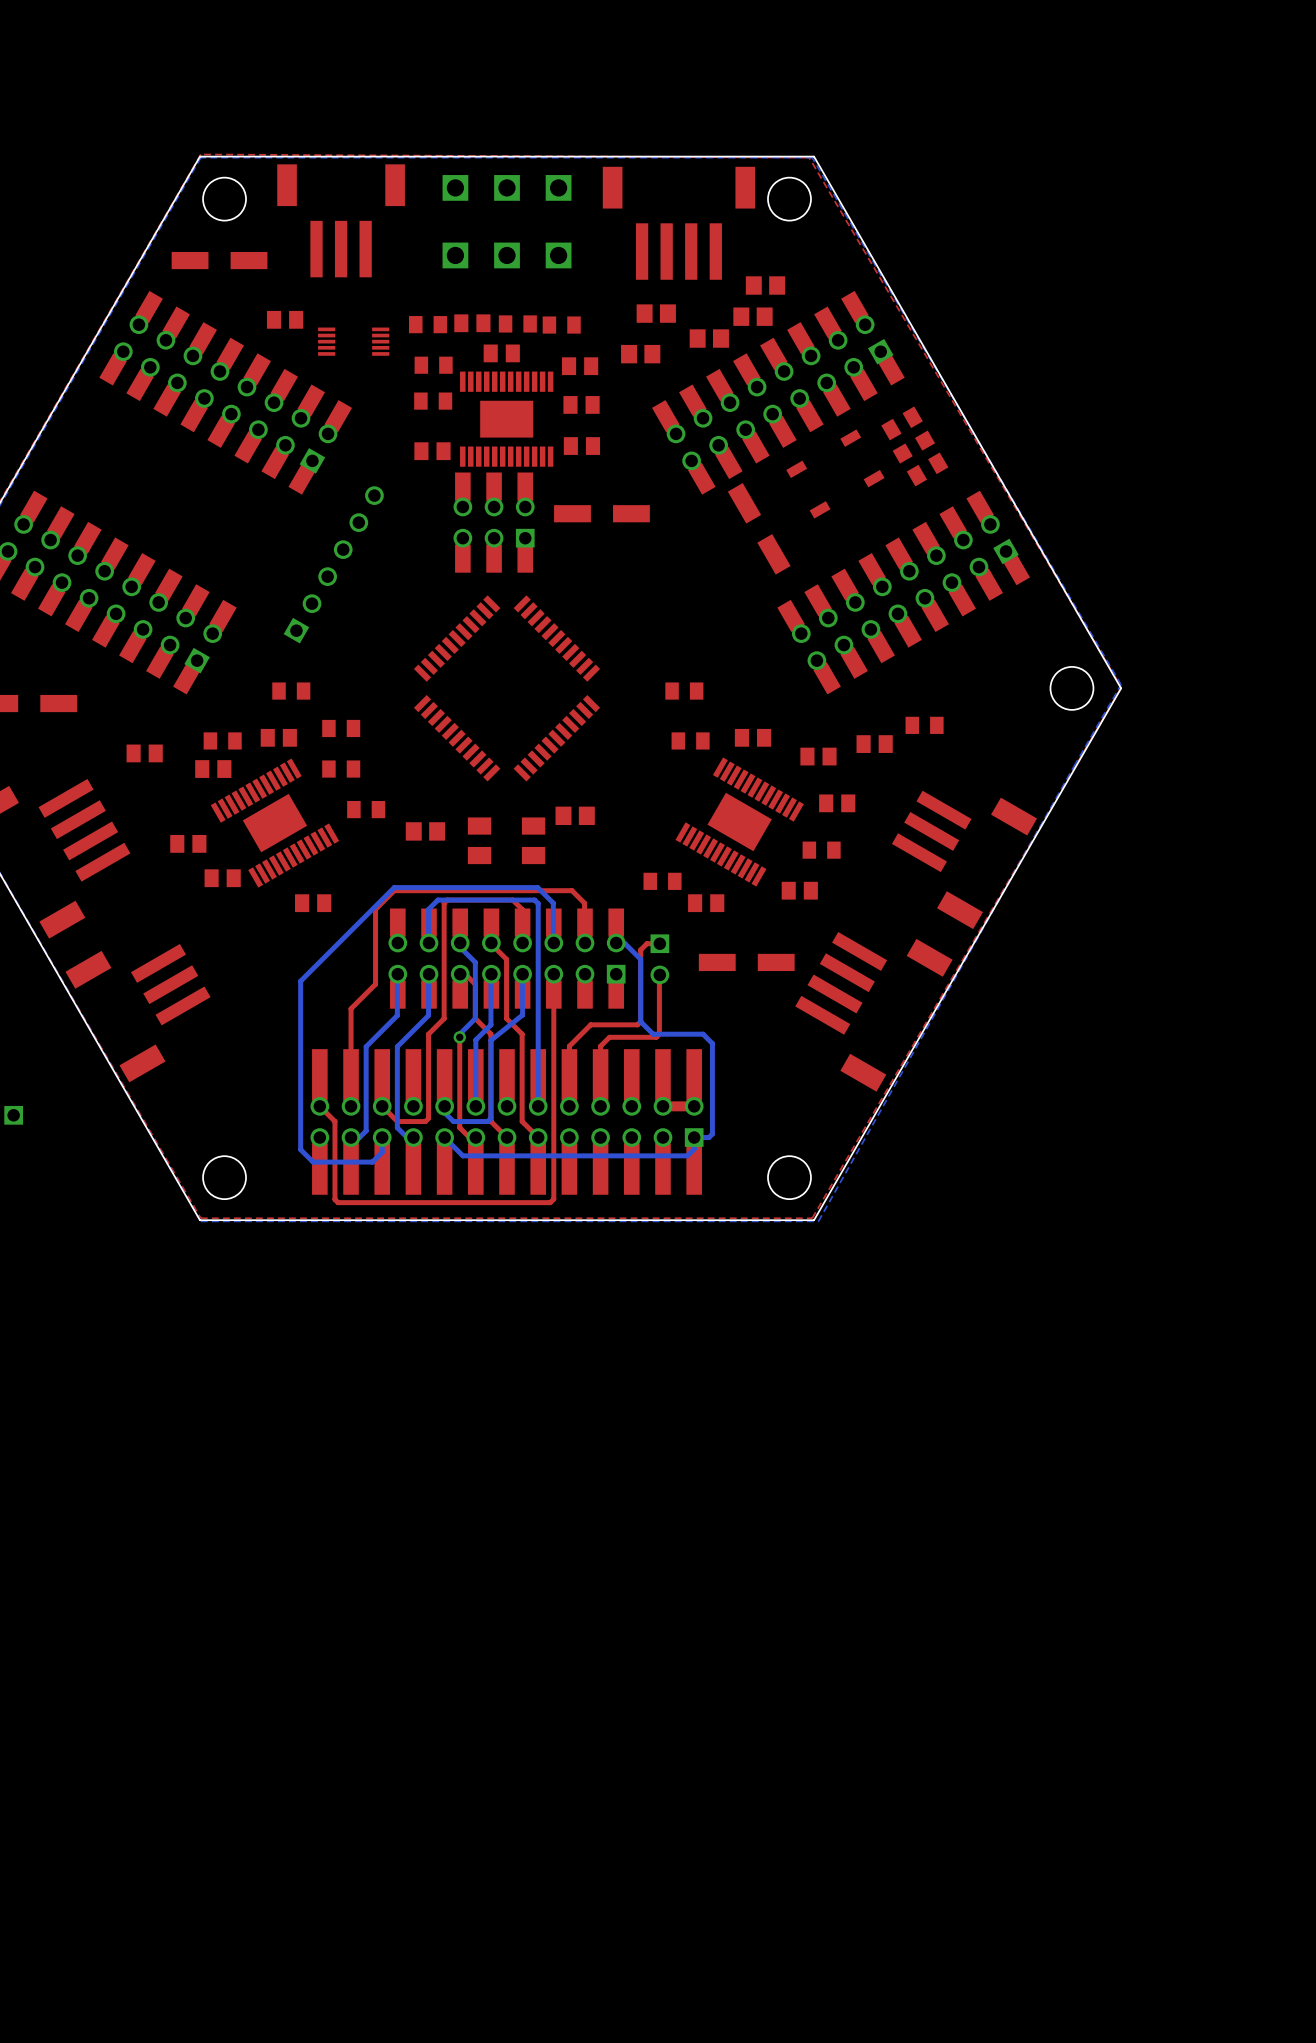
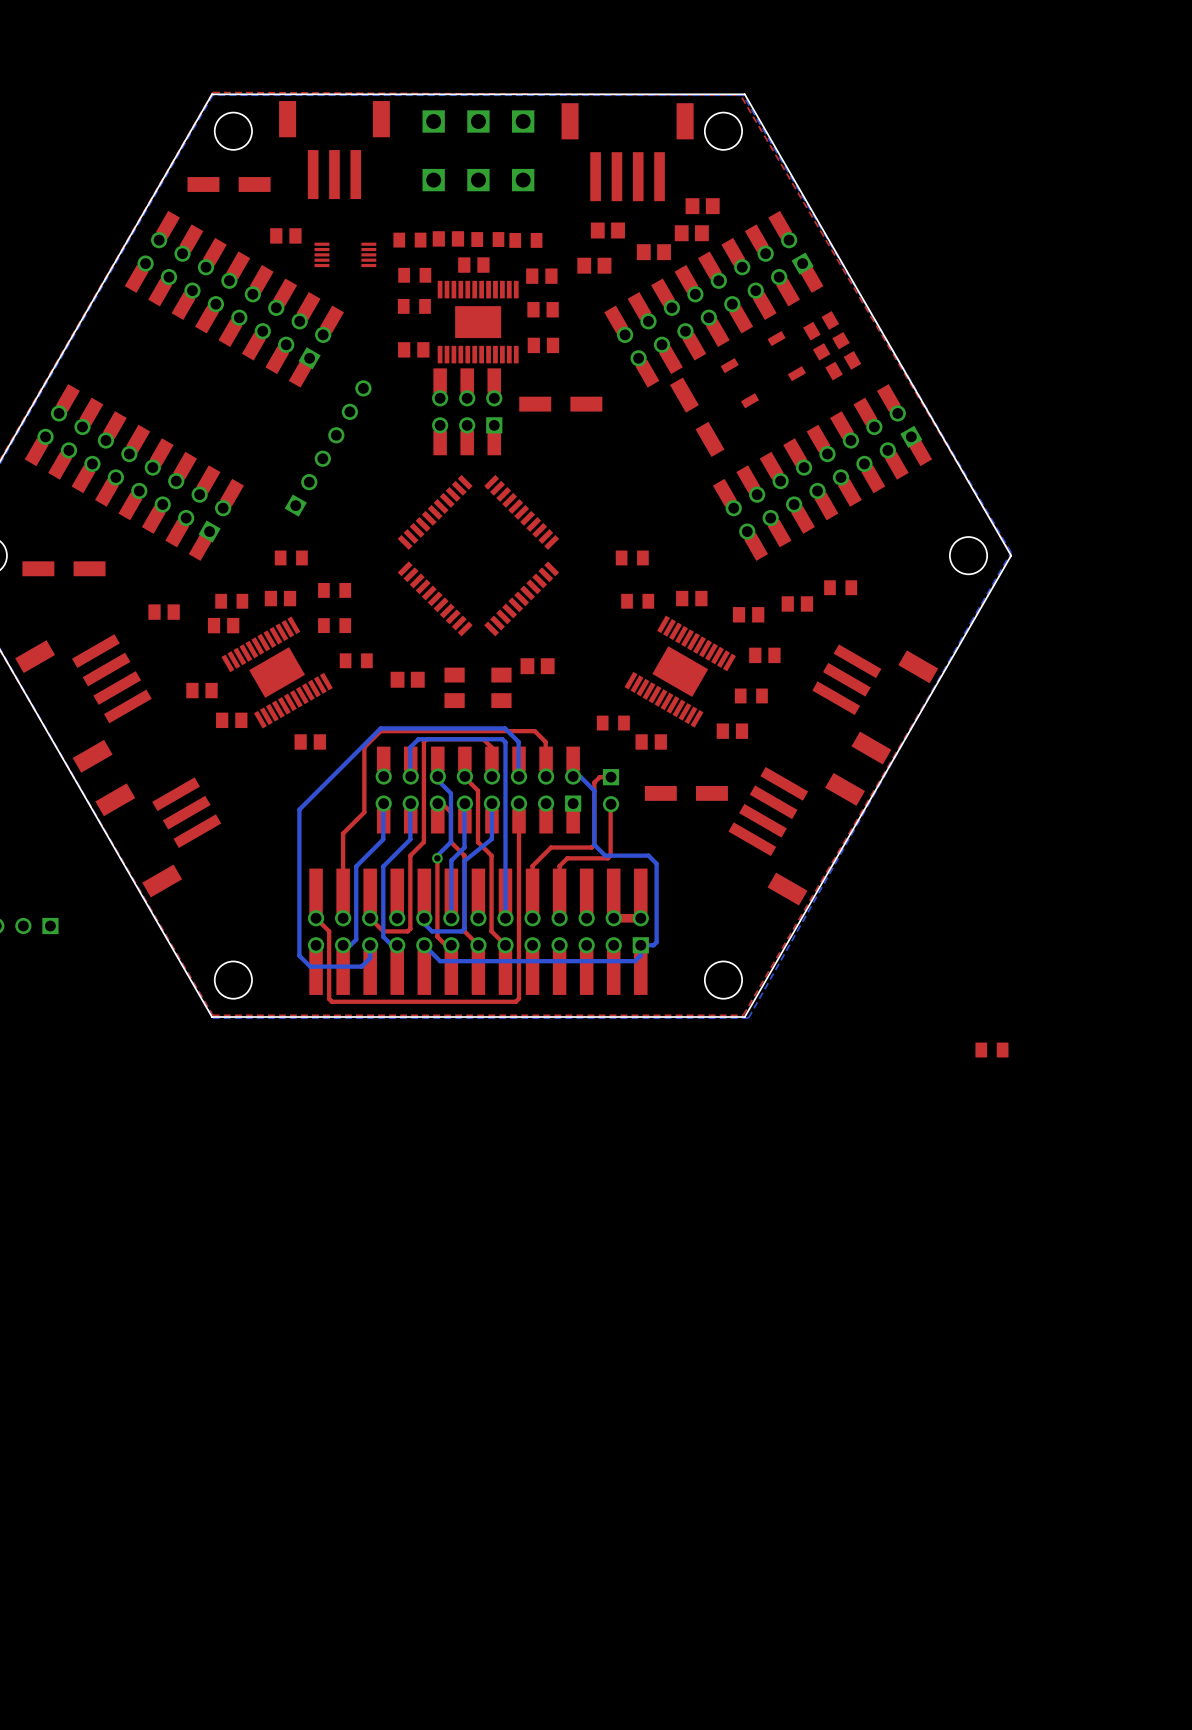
part: none -> (991, 1050)

